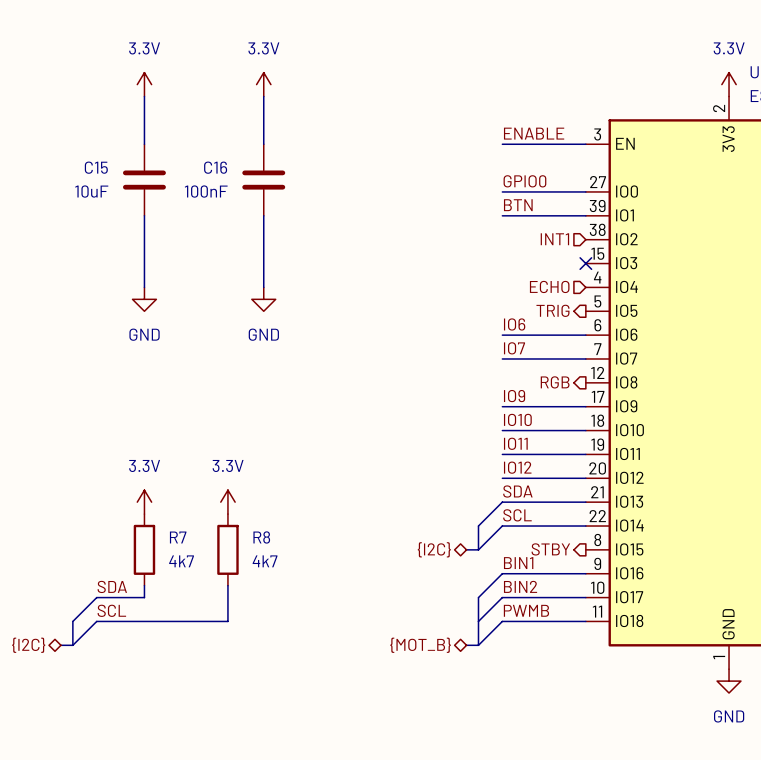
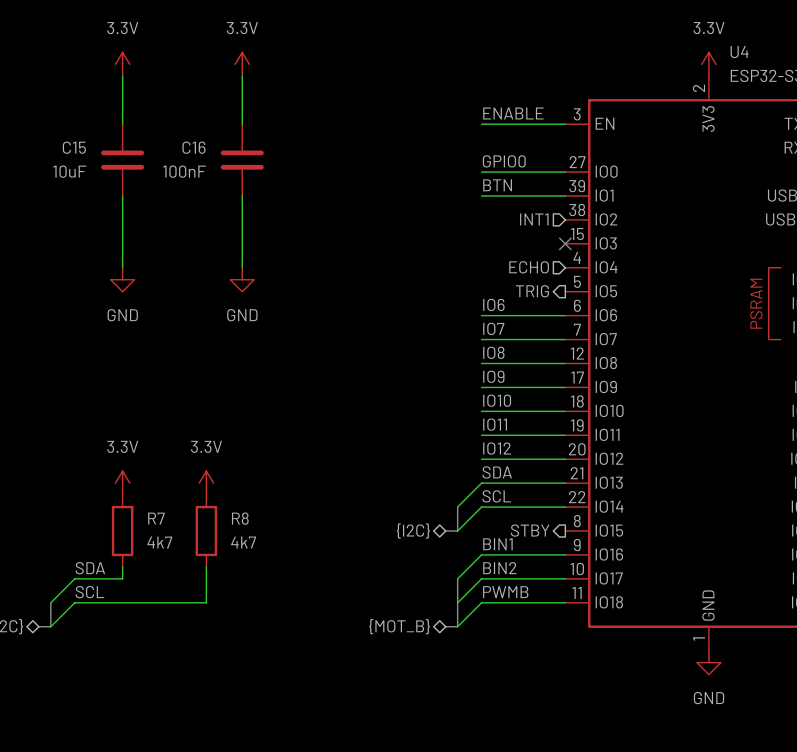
label: none -> IO8 (493, 352)
wire: none -> (481, 363) (565, 363)
hierarchical label: RGB (555, 382) -> none

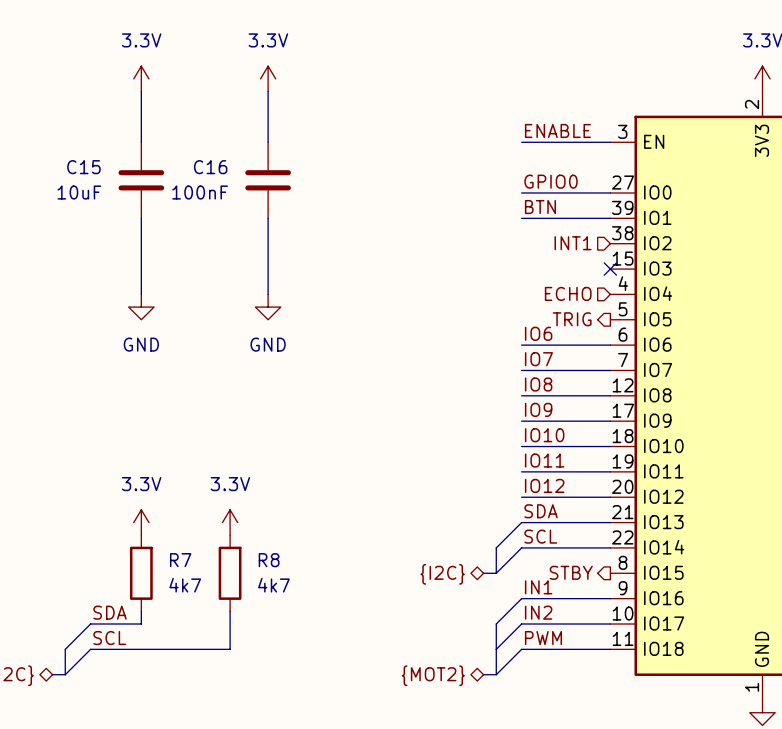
label: BIN1 (497, 544) -> IN1 (538, 587)
label: BIN2 (499, 568) -> IN2 (538, 612)
label: PWMB (505, 592) -> PWM (543, 638)
hierarchical label: {MOT_B} (399, 626) -> {MOT2} (433, 675)

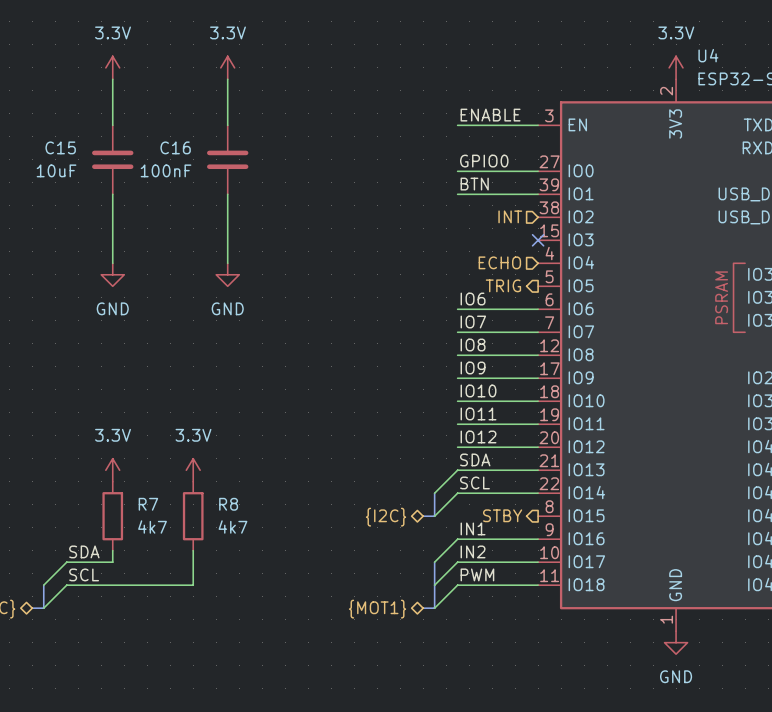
hierarchical label: INT1 (573, 243) -> INT (510, 216)
hierarchical label: {MOT2} (433, 675) -> {MOT1} (377, 609)

